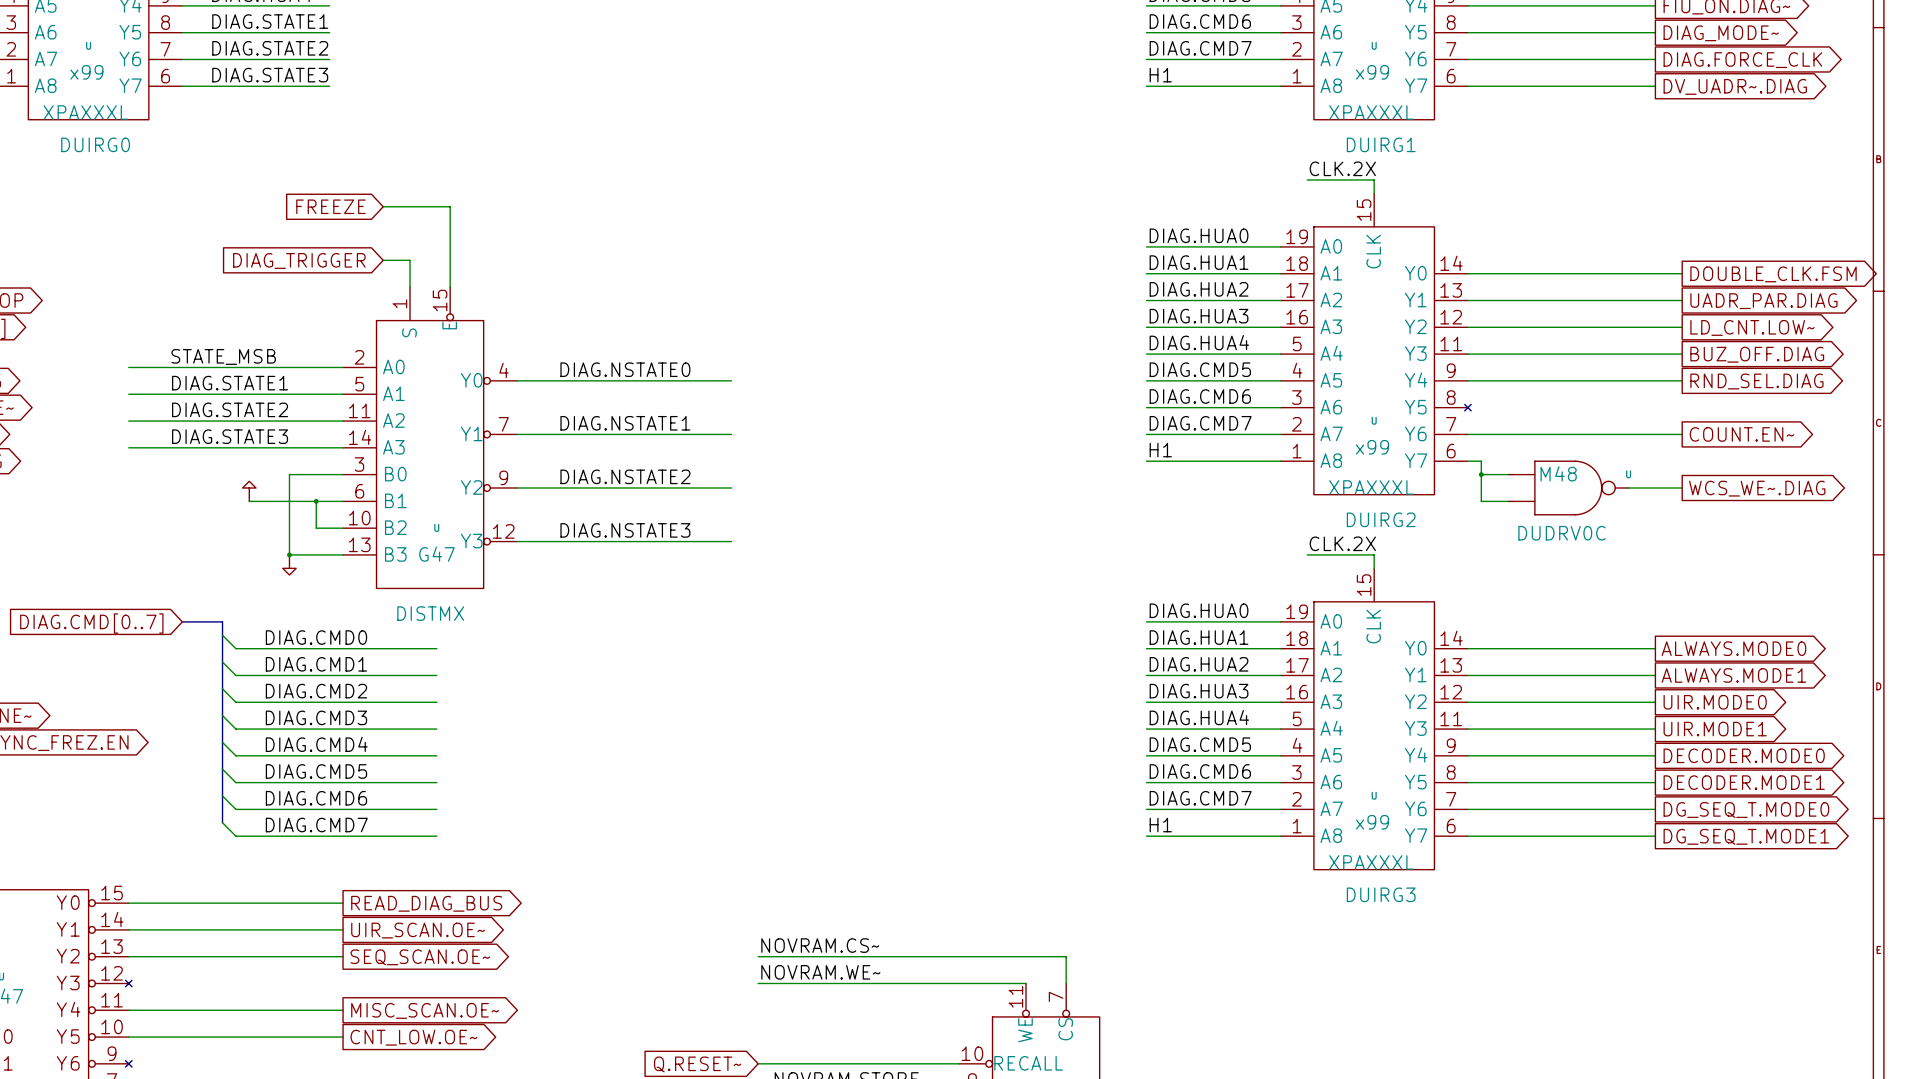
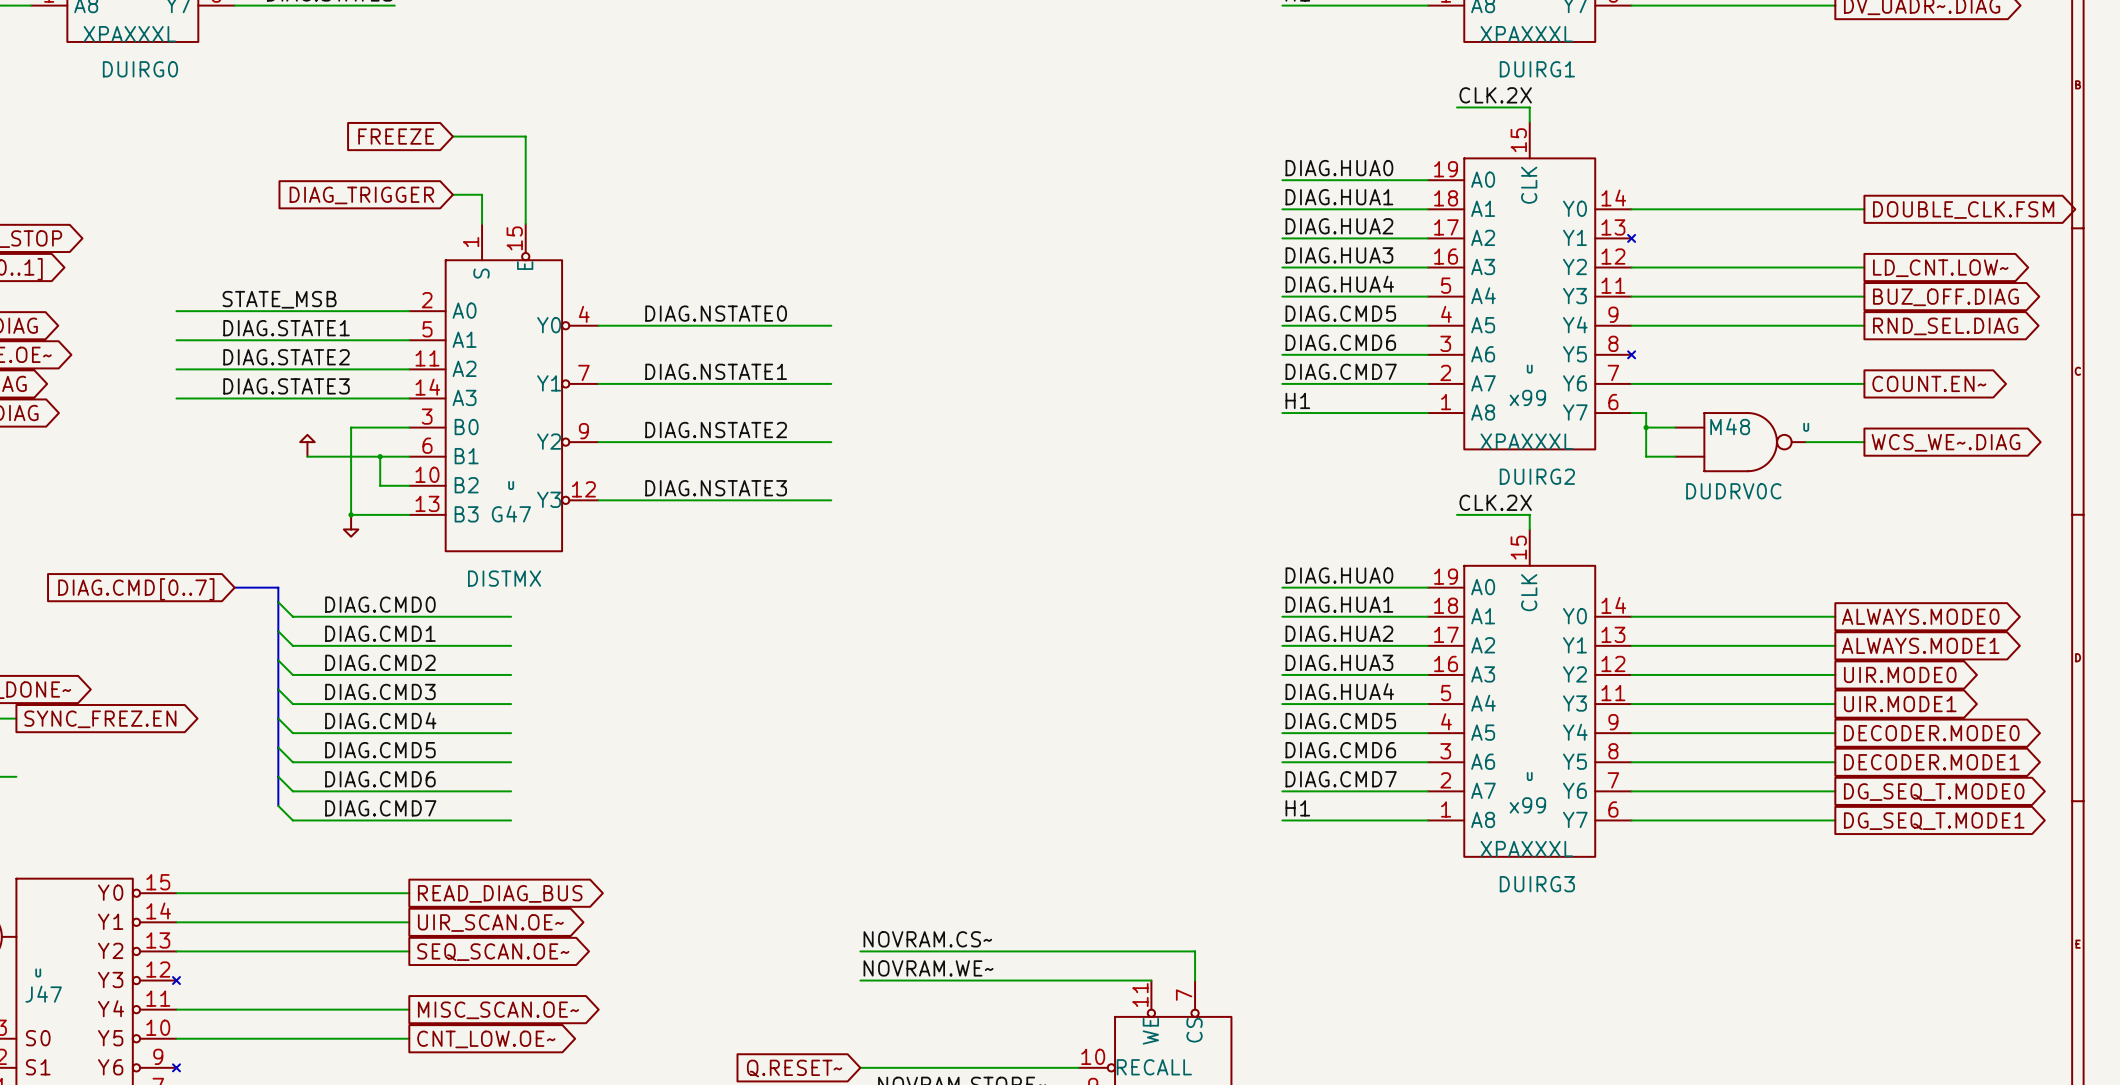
wire: (1467, 300) (1682, 300) -> none
no-connect mark: none -> (1631, 238)
global label: UADR_PAR.DIAG (1763, 301) -> none

